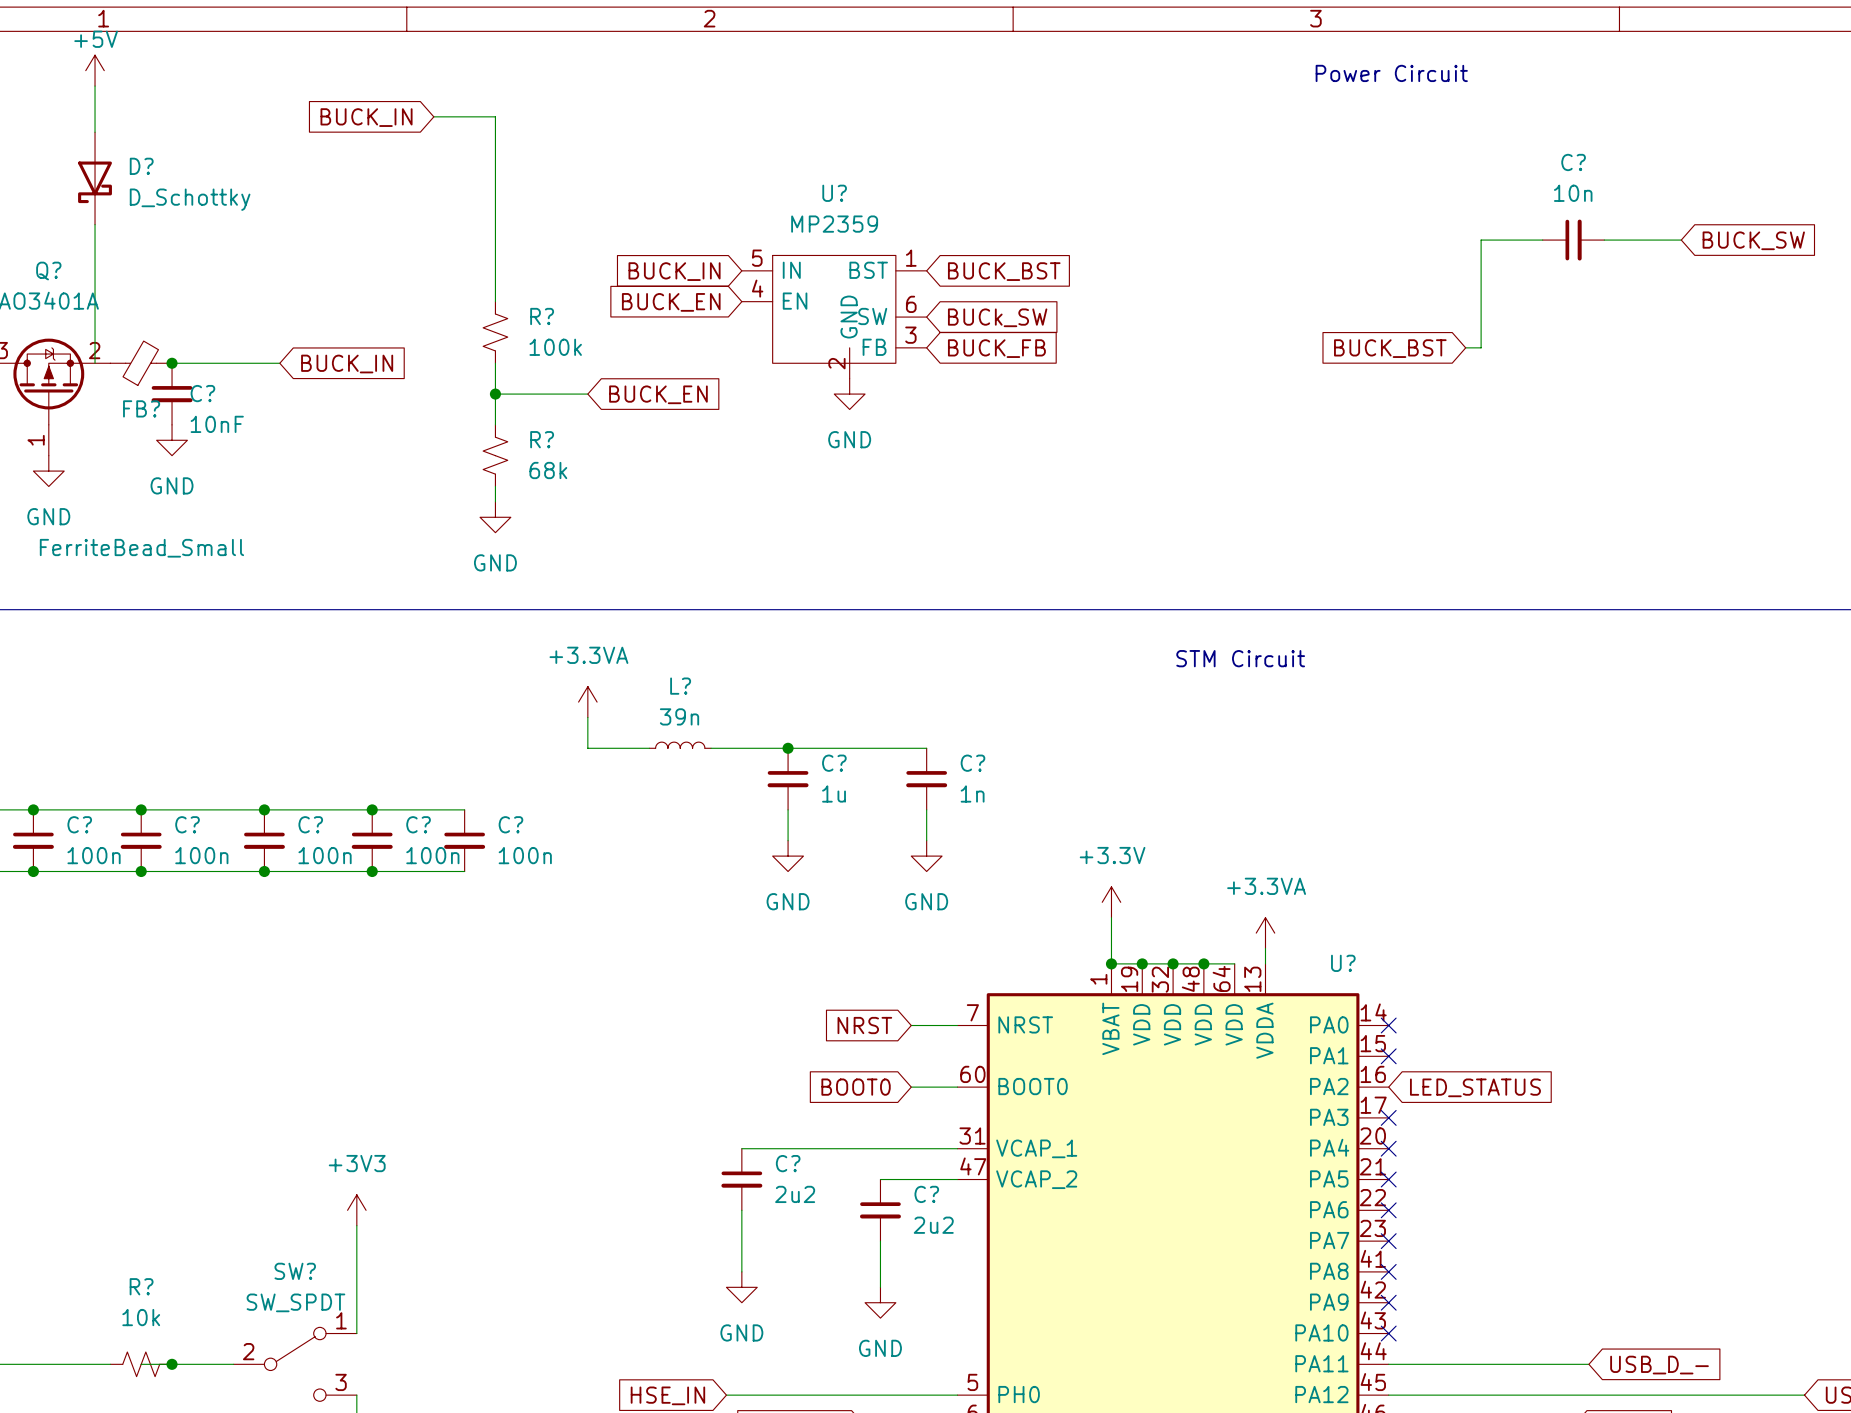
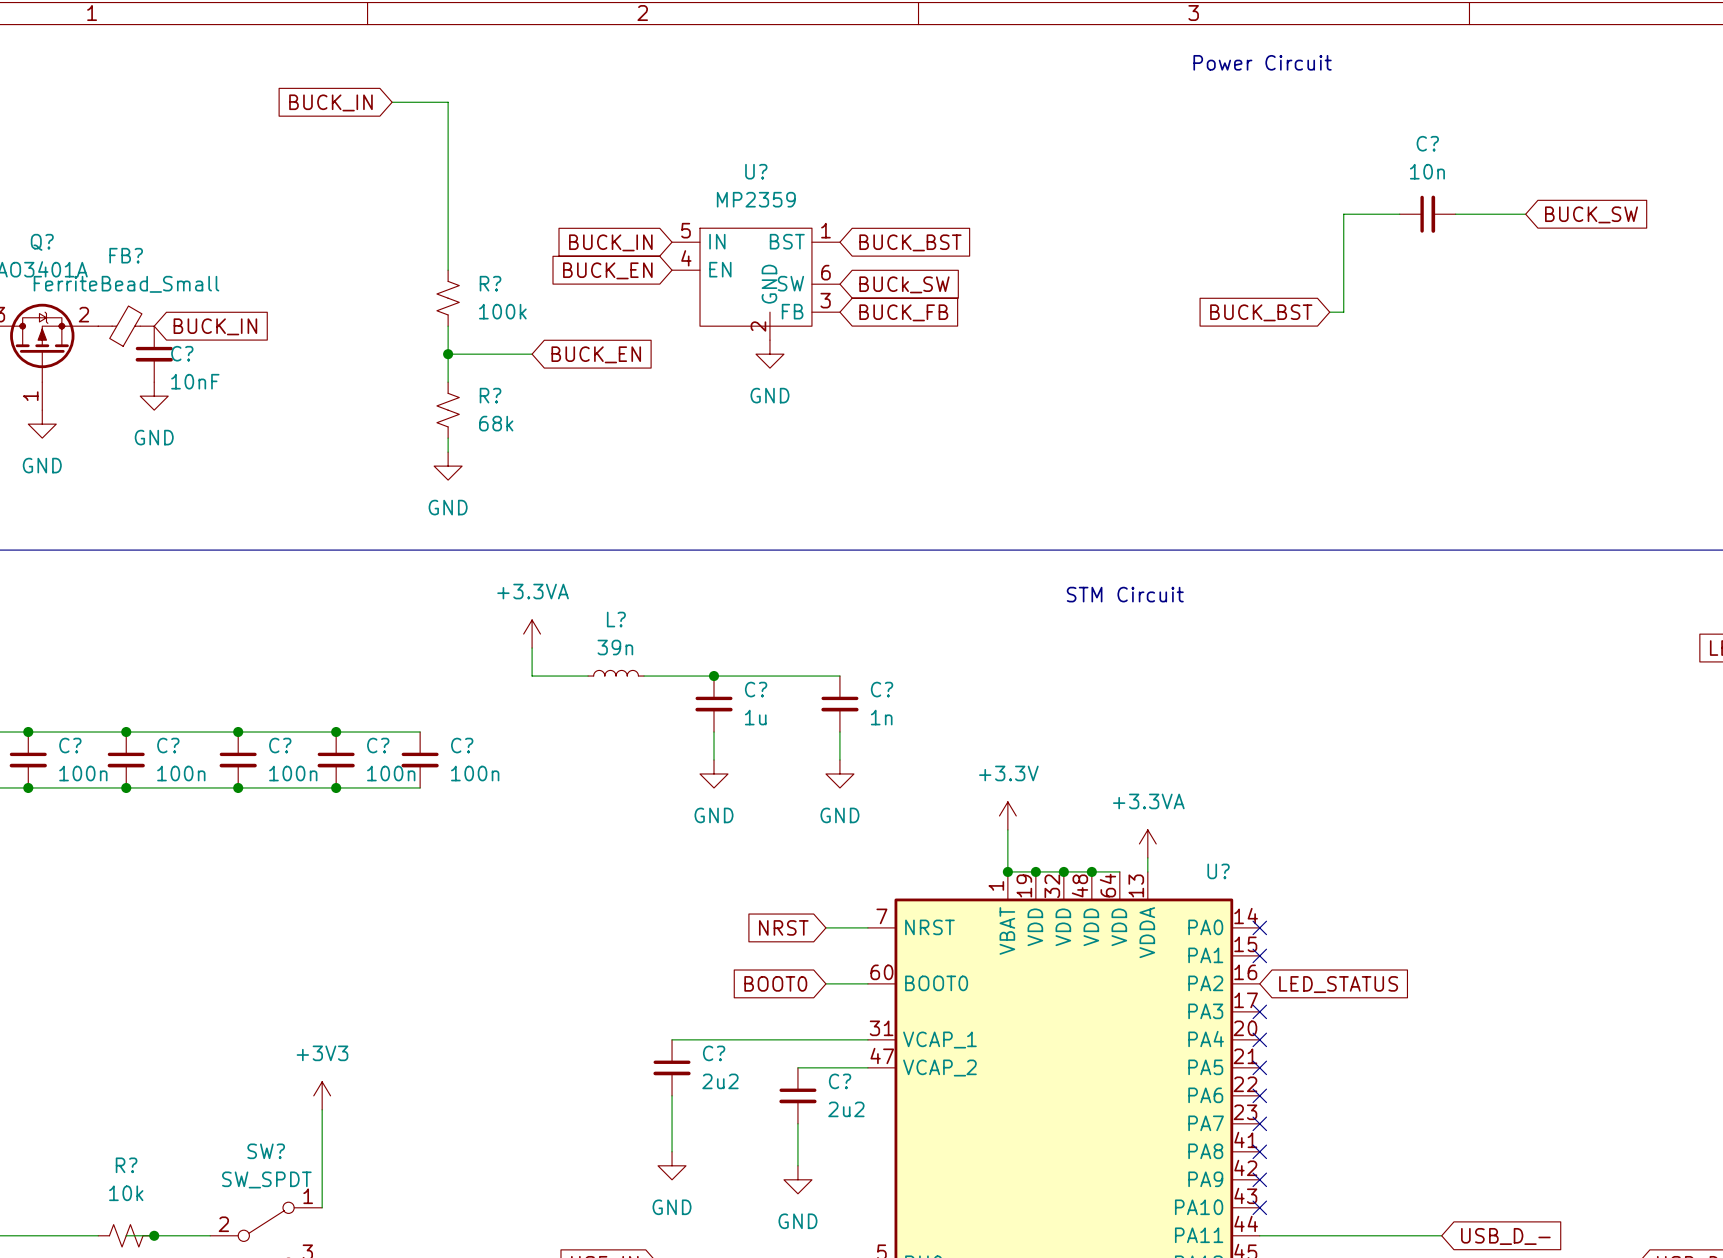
power symbol: +5V (95, 70) -> none
wire: (95, 86) (95, 132) -> none
D?: D_Schottky (95, 178) -> none
wire: (95, 224) (95, 363) -> none
wire: (172, 363) (279, 363) -> none
junction: (172, 363) -> none
global label position: BUCK_IN (347, 364) -> BUCK_IN (215, 326)
FB? name position: FB? (141, 408) -> FB? (126, 255)
FB? value position: FerriteBead_Small (141, 548) -> FerriteBead_Small (126, 284)

